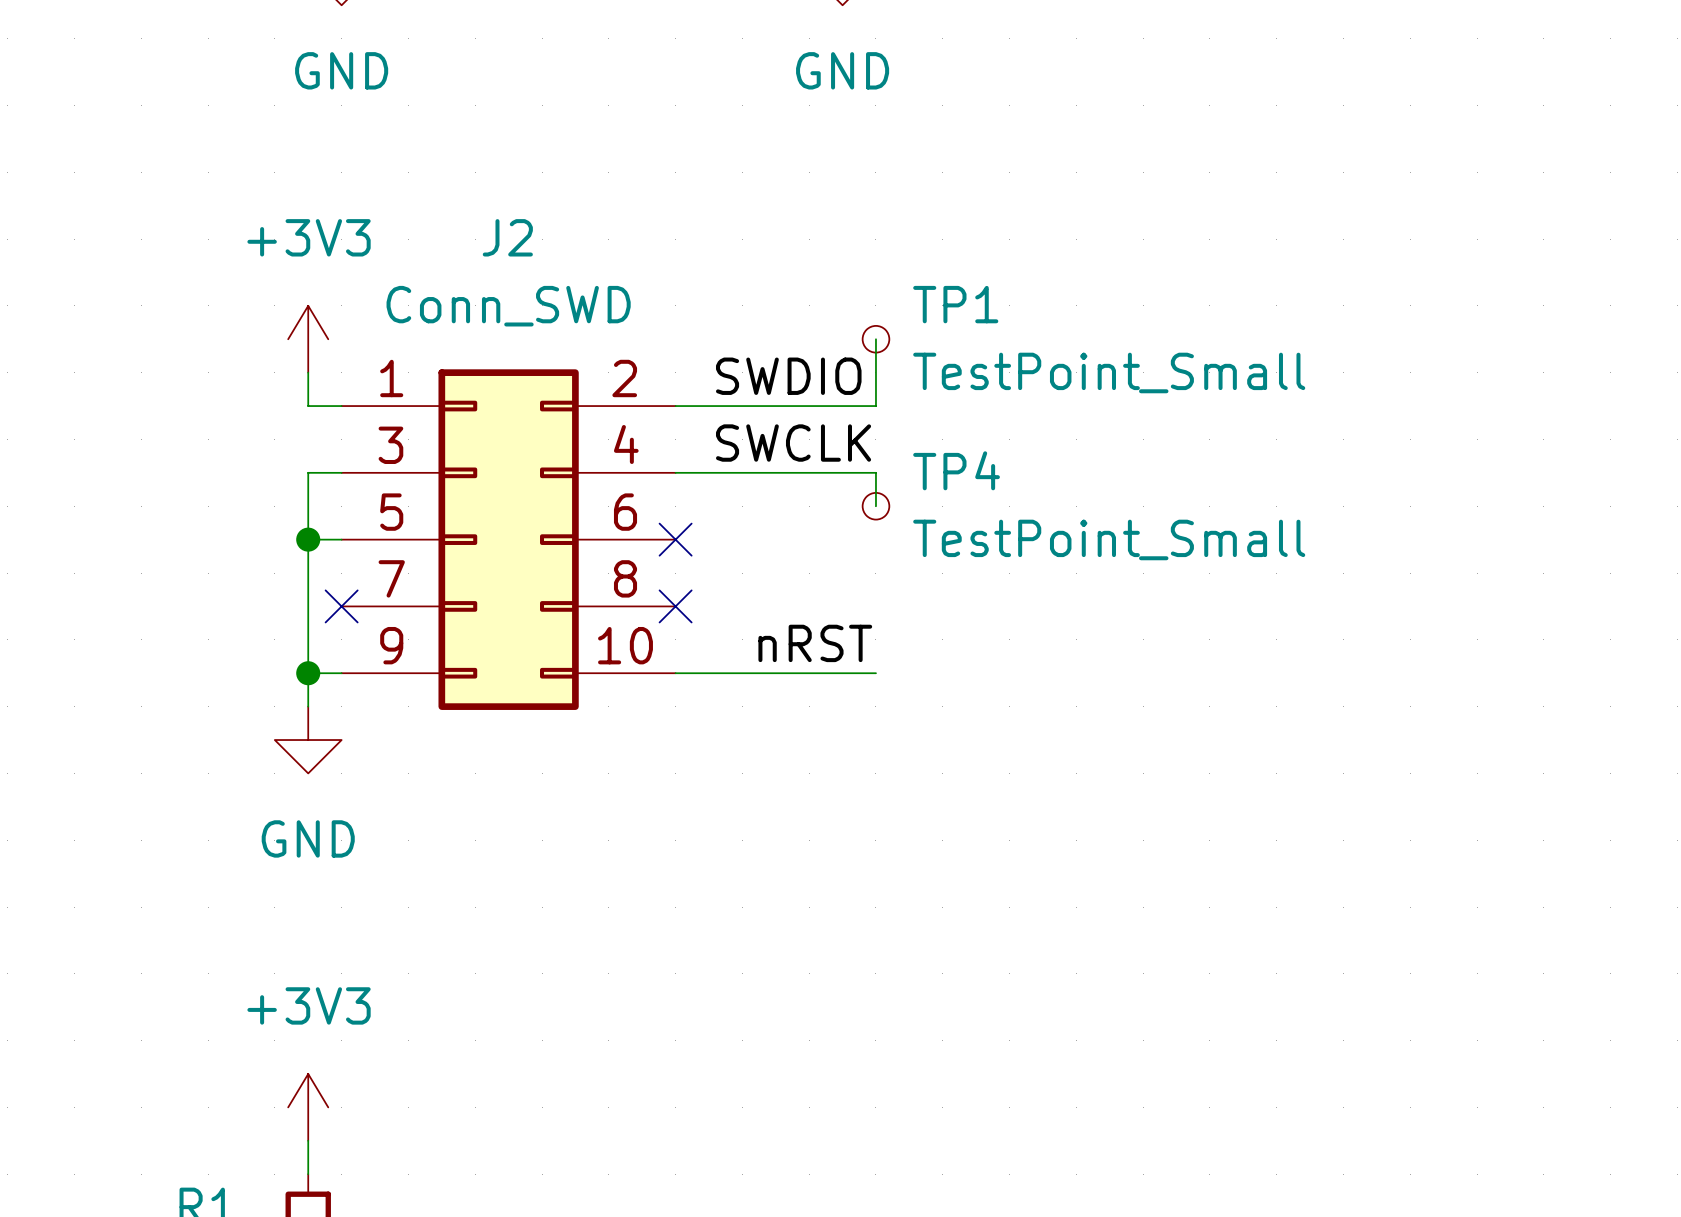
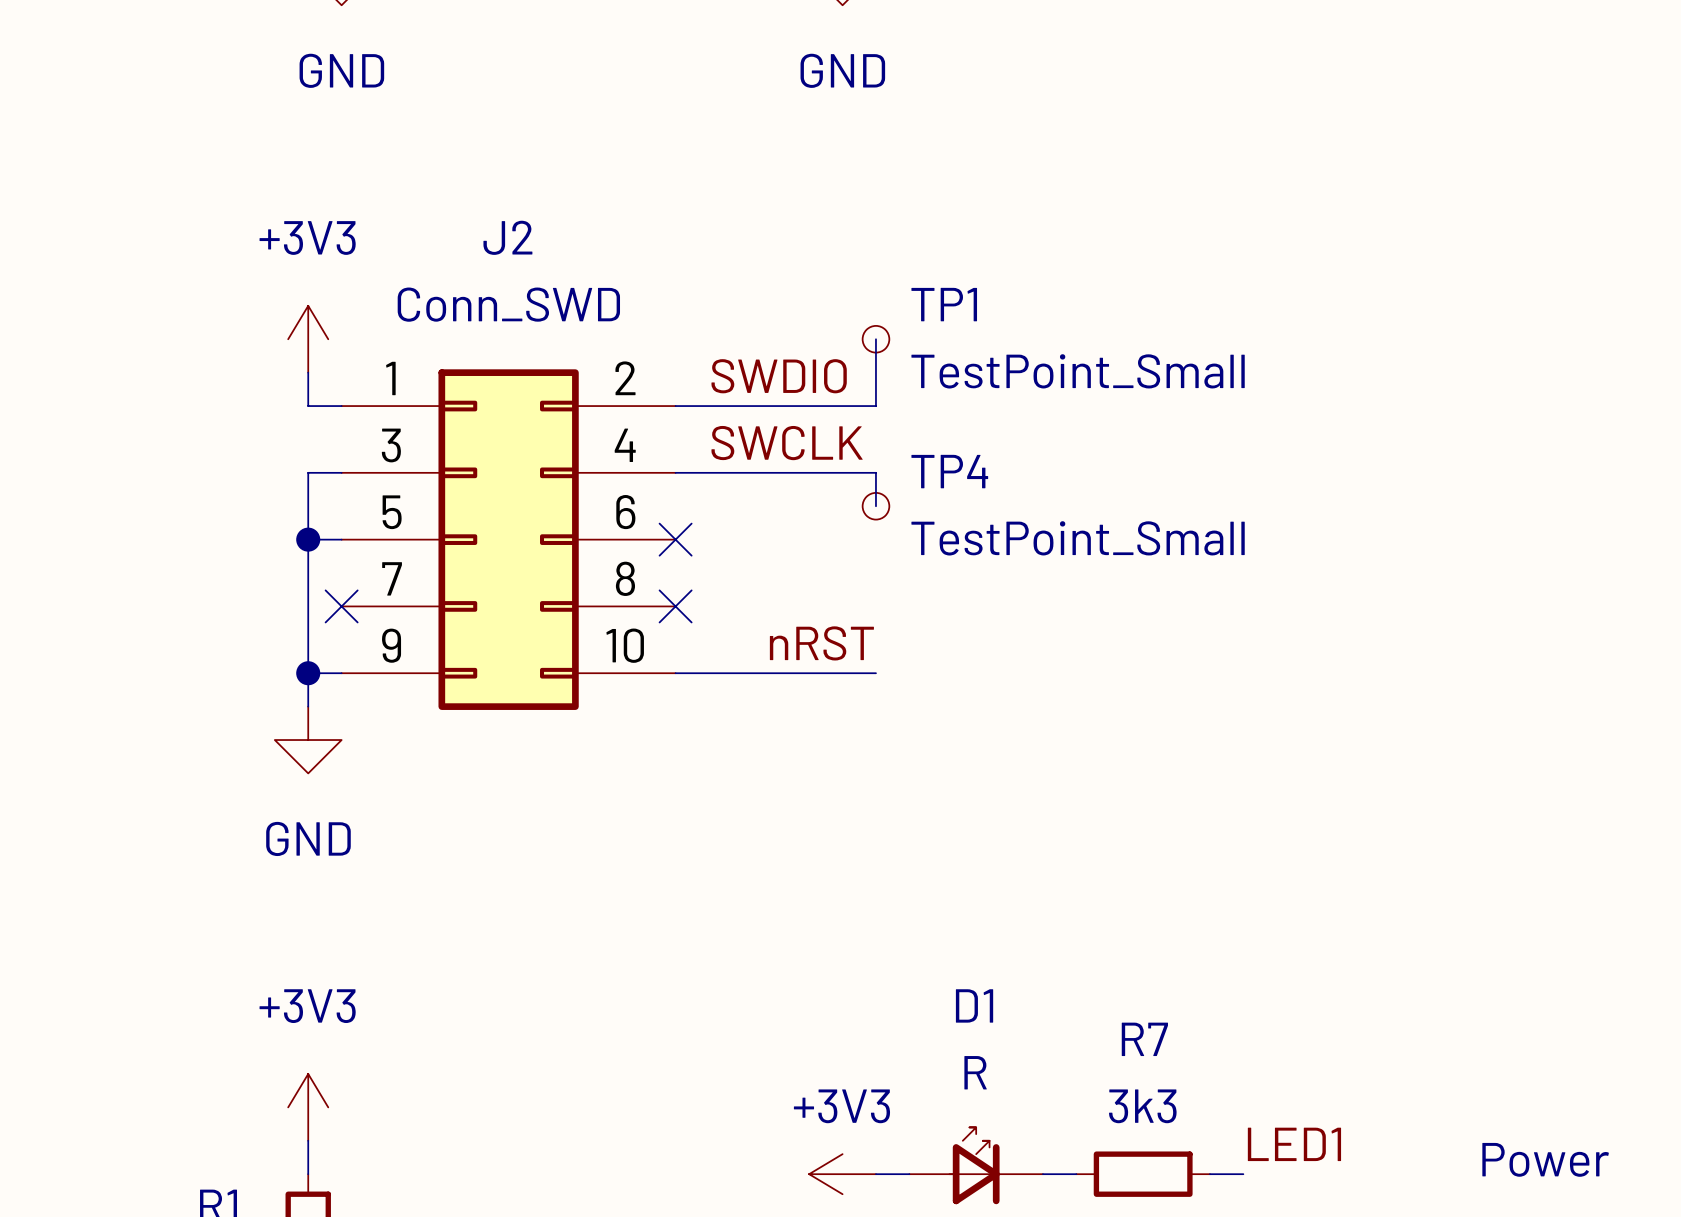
label: none -> LED1 (1294, 1144)
text: none -> Power (1545, 1159)
D1: none -> R (976, 1165)
power symbol: none -> +3V3 (842, 1174)
wire: none -> (875, 1174) (909, 1174)
wire: none -> (1042, 1174) (1076, 1174)
R7: none -> 3k3 (1143, 1174)
wire: none -> (1209, 1174) (1243, 1174)

